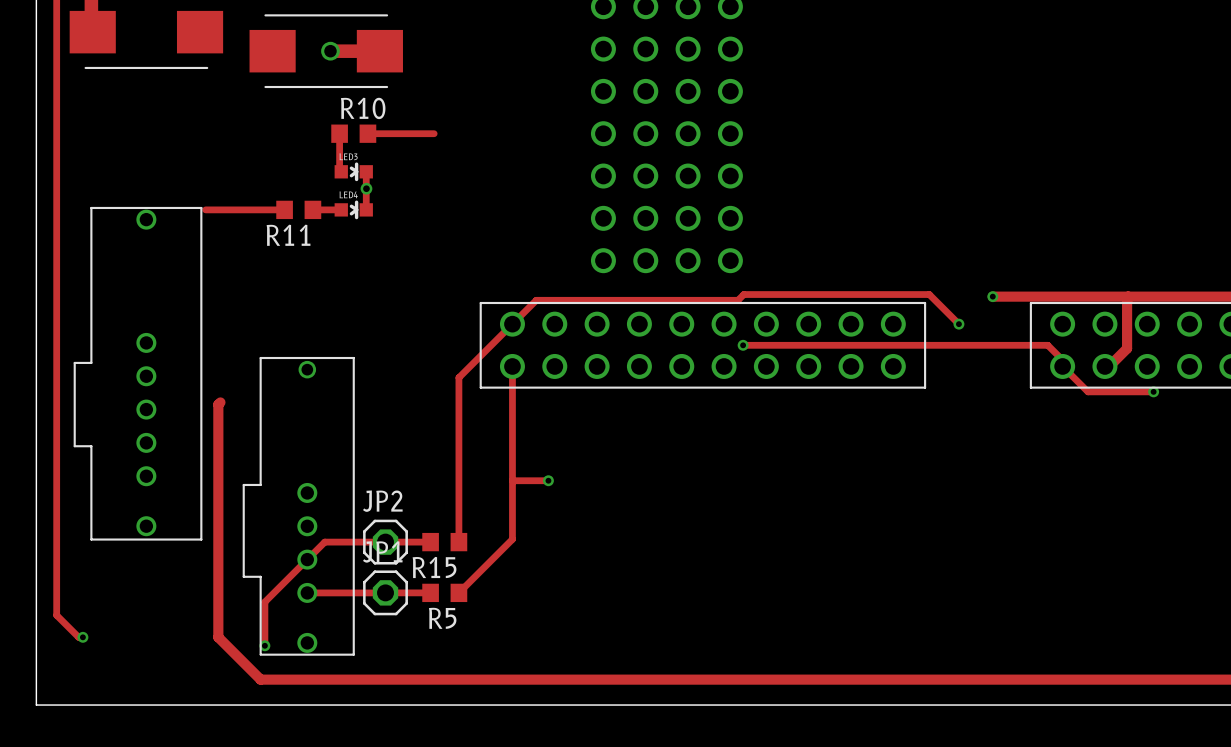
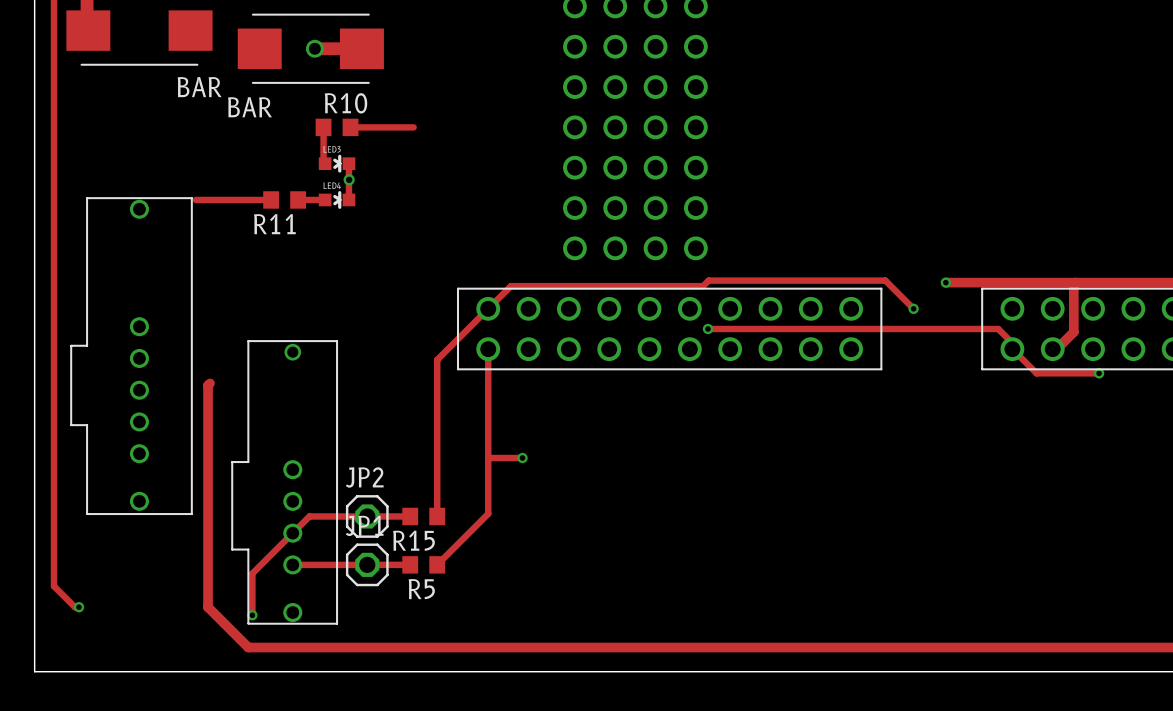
text: none -> BAR (199, 87)
text: none -> BAR (250, 107)

